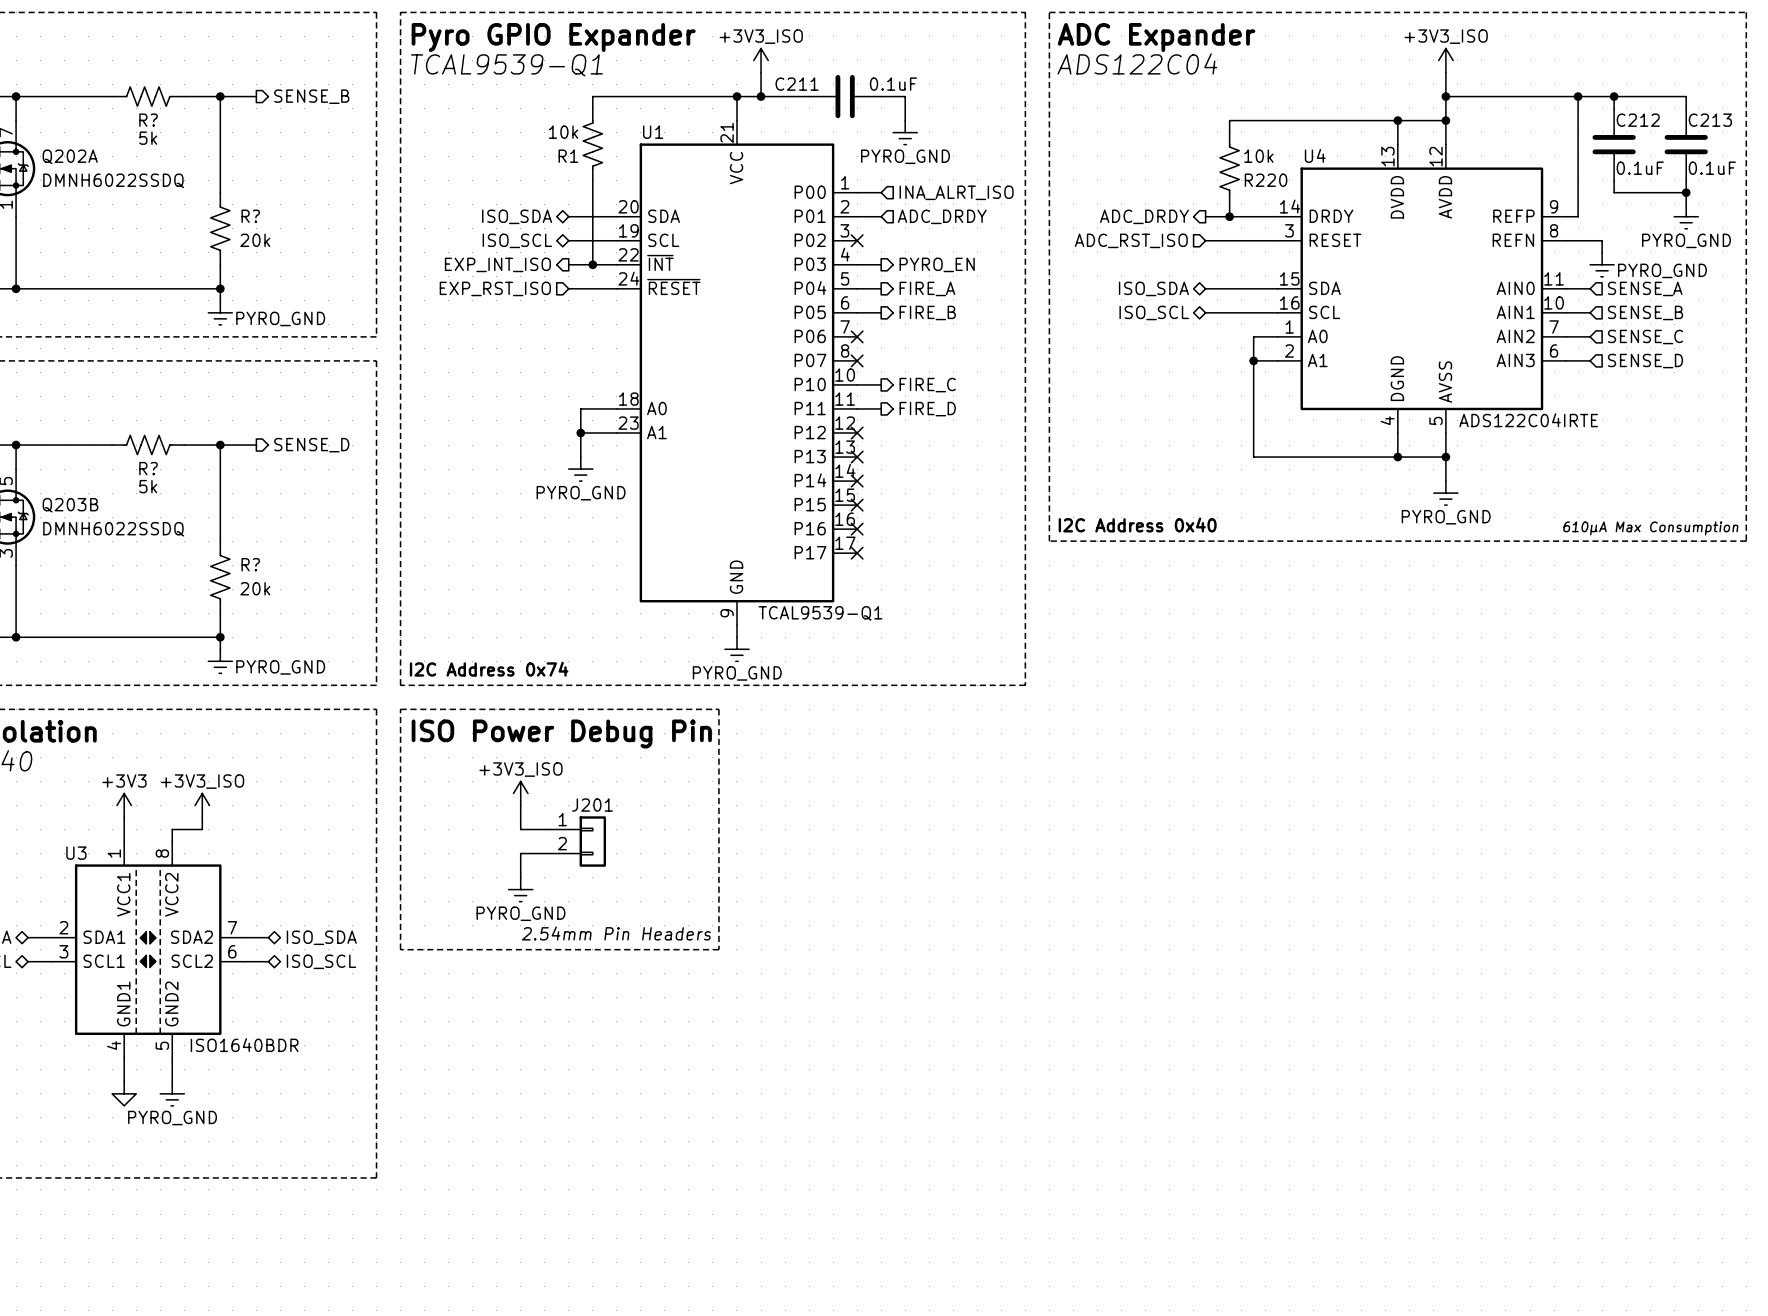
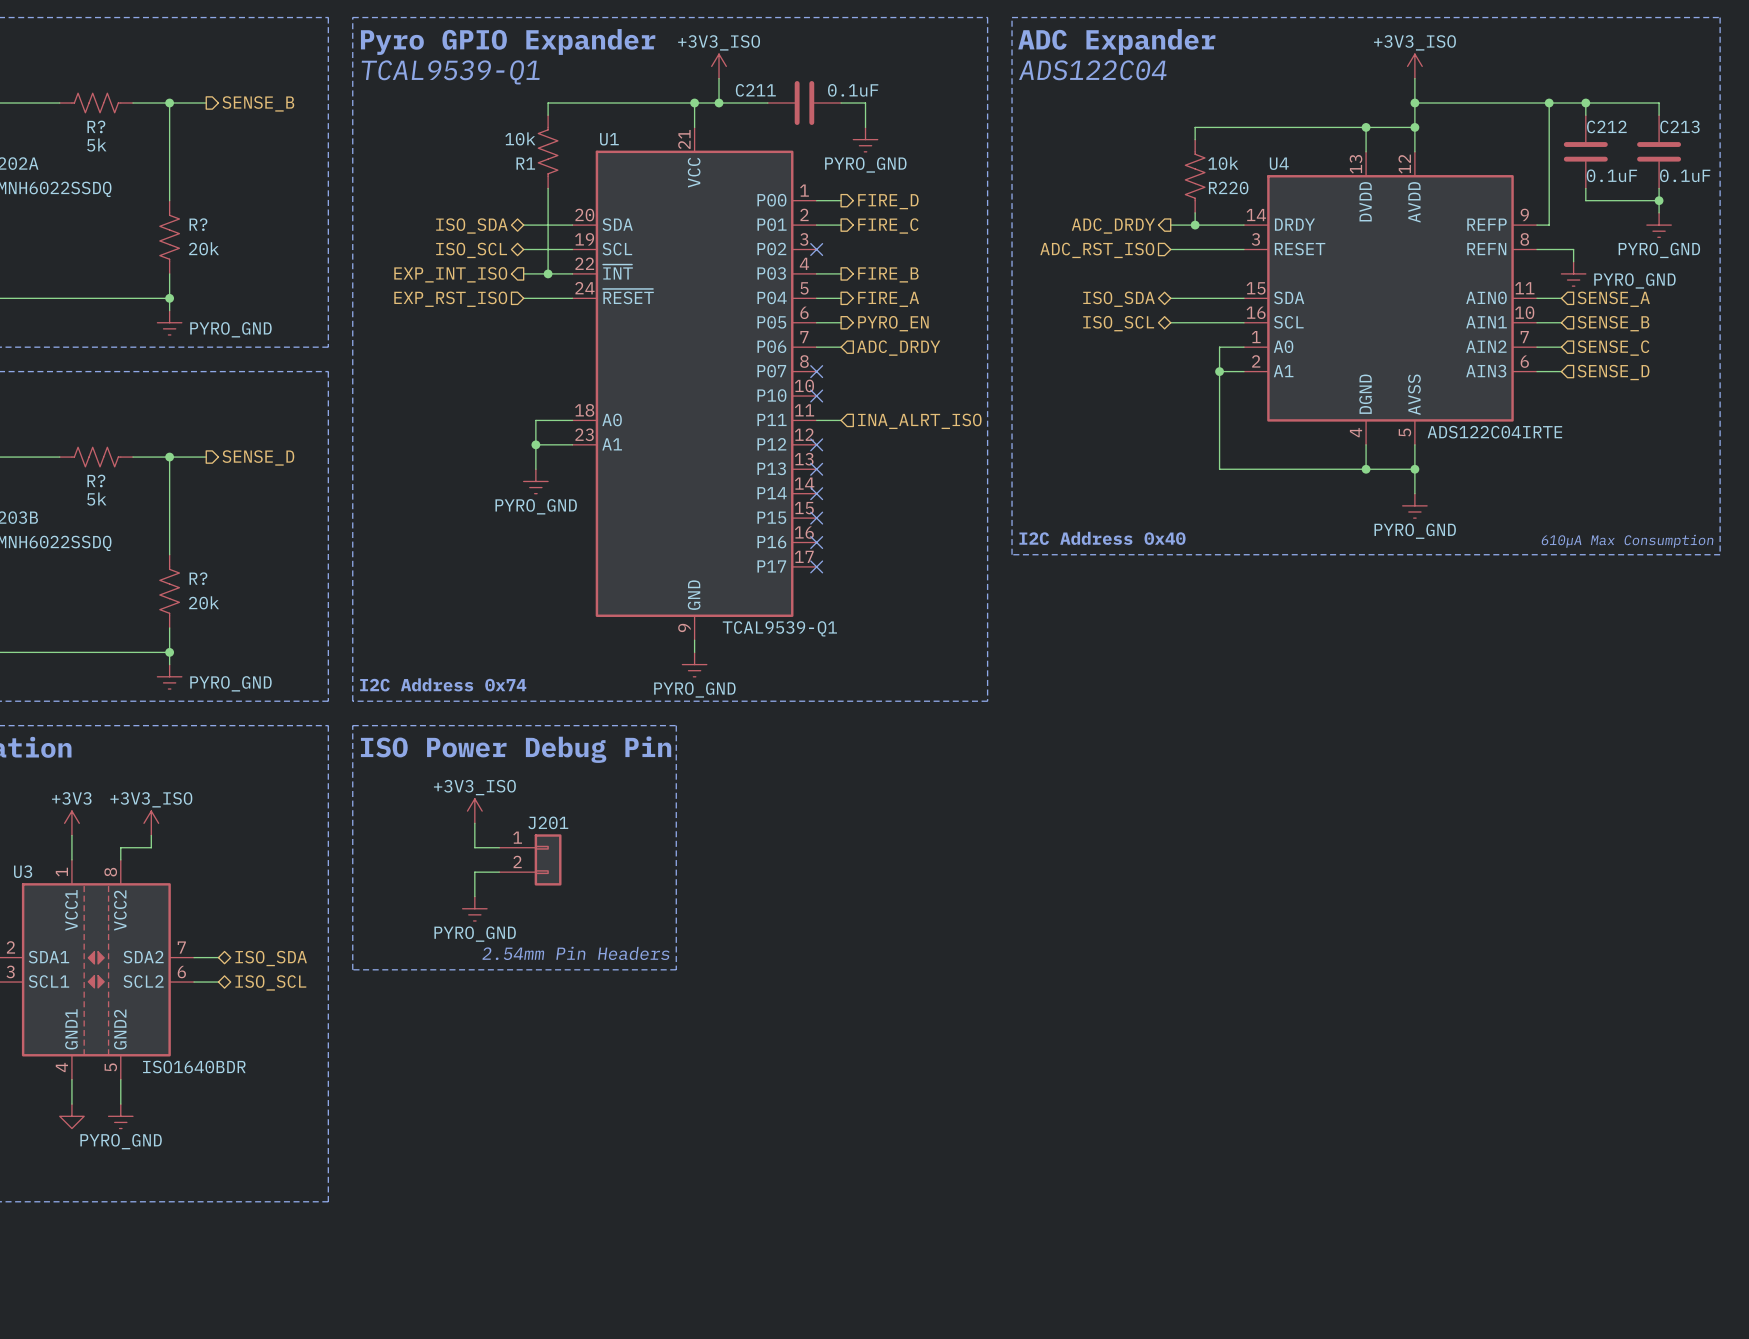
hierarchical label shape: input (956, 192) -> output (888, 201)
hierarchical label: INA_ALRT_ISO (956, 192) -> FIRE_D (888, 201)
hierarchical label shape: input (942, 216) -> output (888, 226)
hierarchical label: ADC_DRDY (942, 216) -> FIRE_C (888, 226)
hierarchical label: PYRO_EN (937, 264) -> FIRE_B (888, 274)
hierarchical label: FIRE_B (927, 312) -> PYRO_EN (893, 323)
no-connect mark position: (857, 336) -> (816, 396)
hierarchical label: none -> ADC_DRDY (898, 348)
wire: (857, 384) (881, 384) -> (816, 347) (841, 347)
hierarchical label: FIRE_C (927, 385) -> none
hierarchical label shape: output (927, 409) -> input (919, 421)
hierarchical label: FIRE_D (927, 409) -> INA_ALRT_ISO (919, 421)

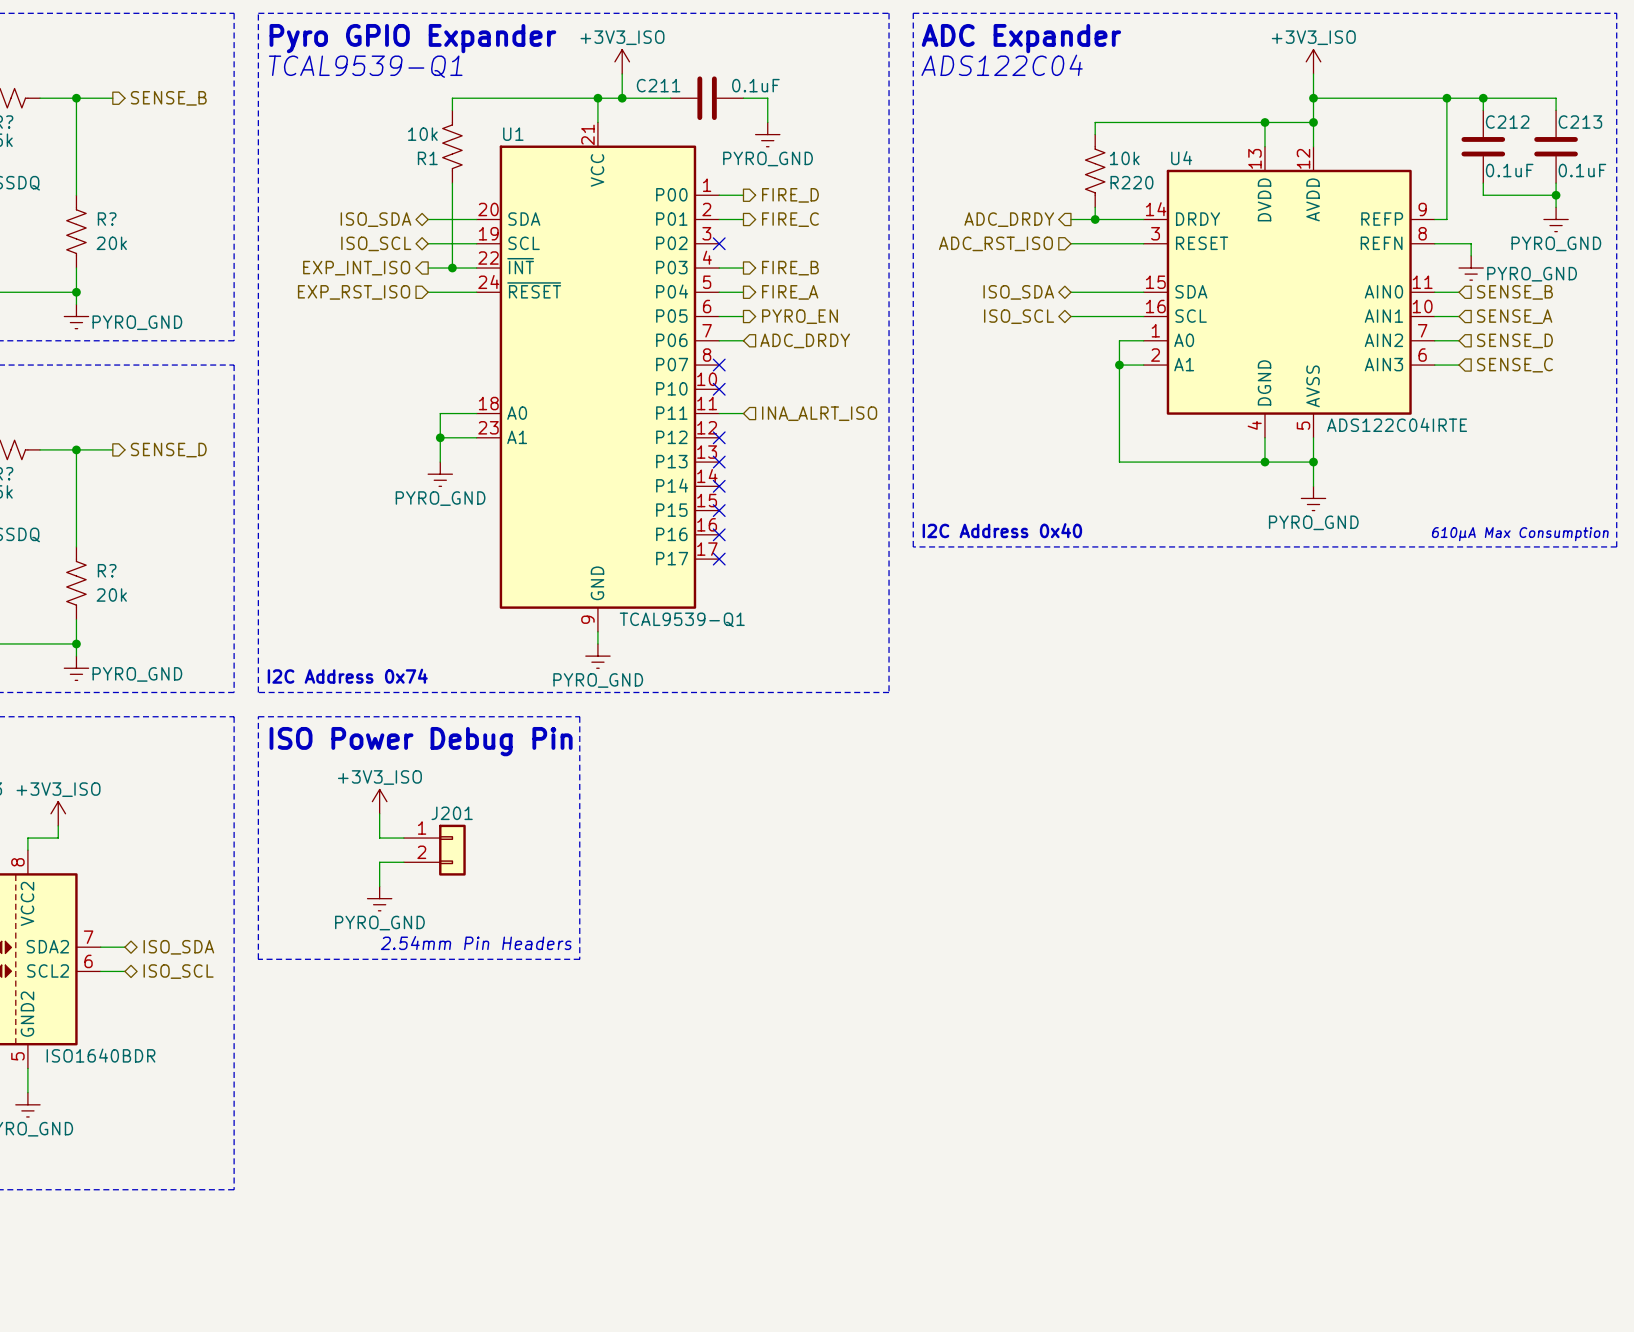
hierarchical label: SENSE_A (1613, 299) -> SENSE_B (1514, 292)
hierarchical label: SENSE_B (1613, 323) -> SENSE_A (1514, 316)
hierarchical label: SENSE_C (1613, 348) -> SENSE_D (1514, 340)
hierarchical label: SENSE_D (1613, 372) -> SENSE_C (1514, 365)

